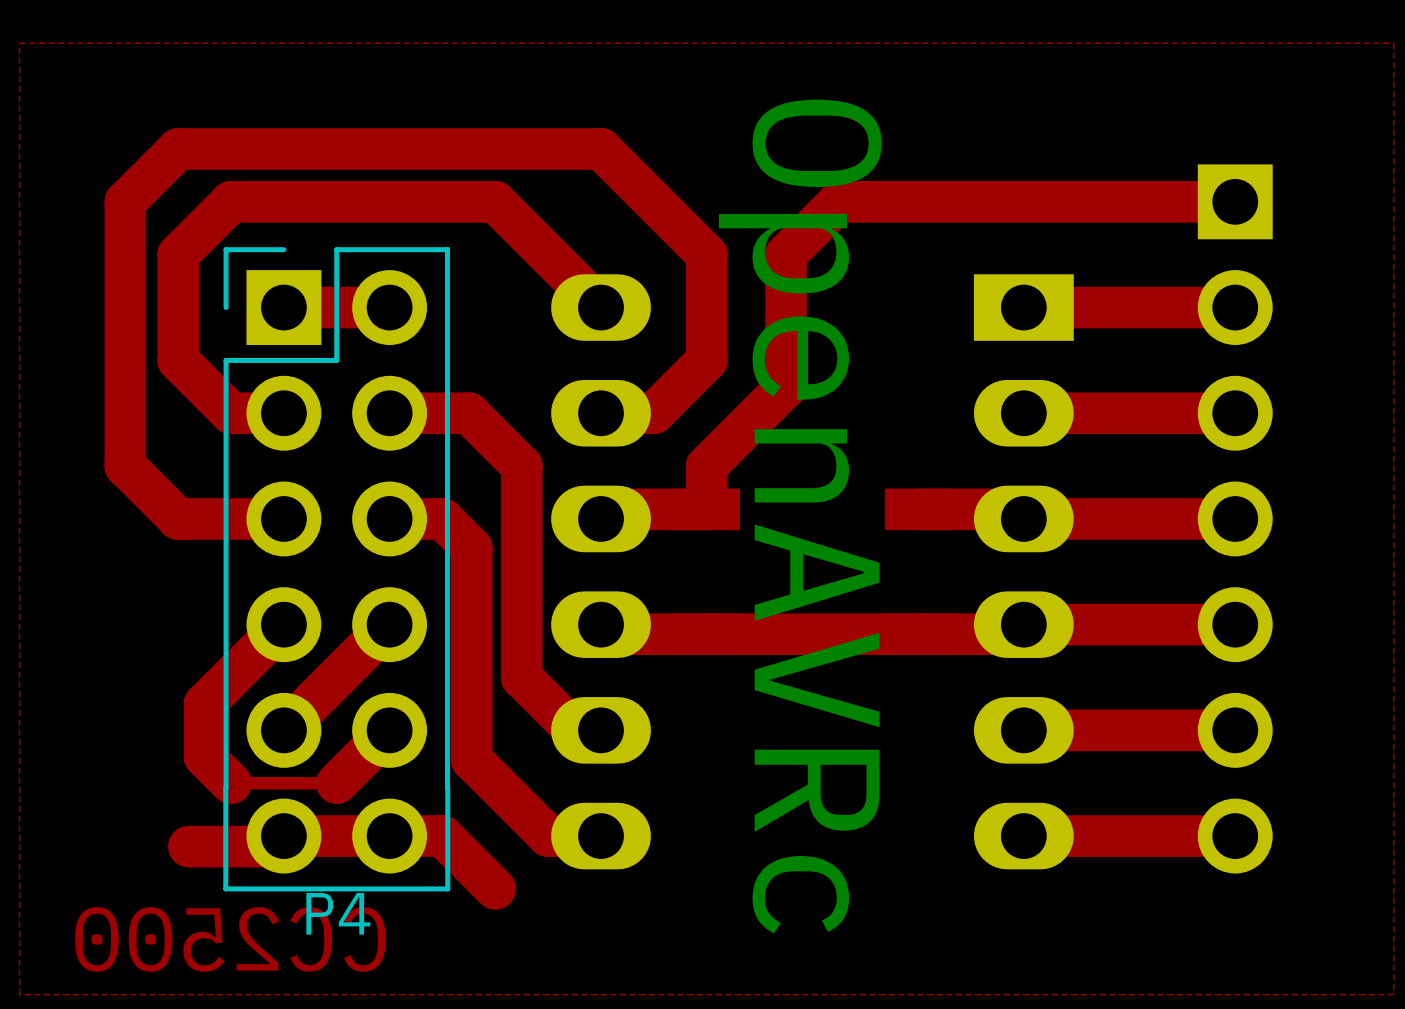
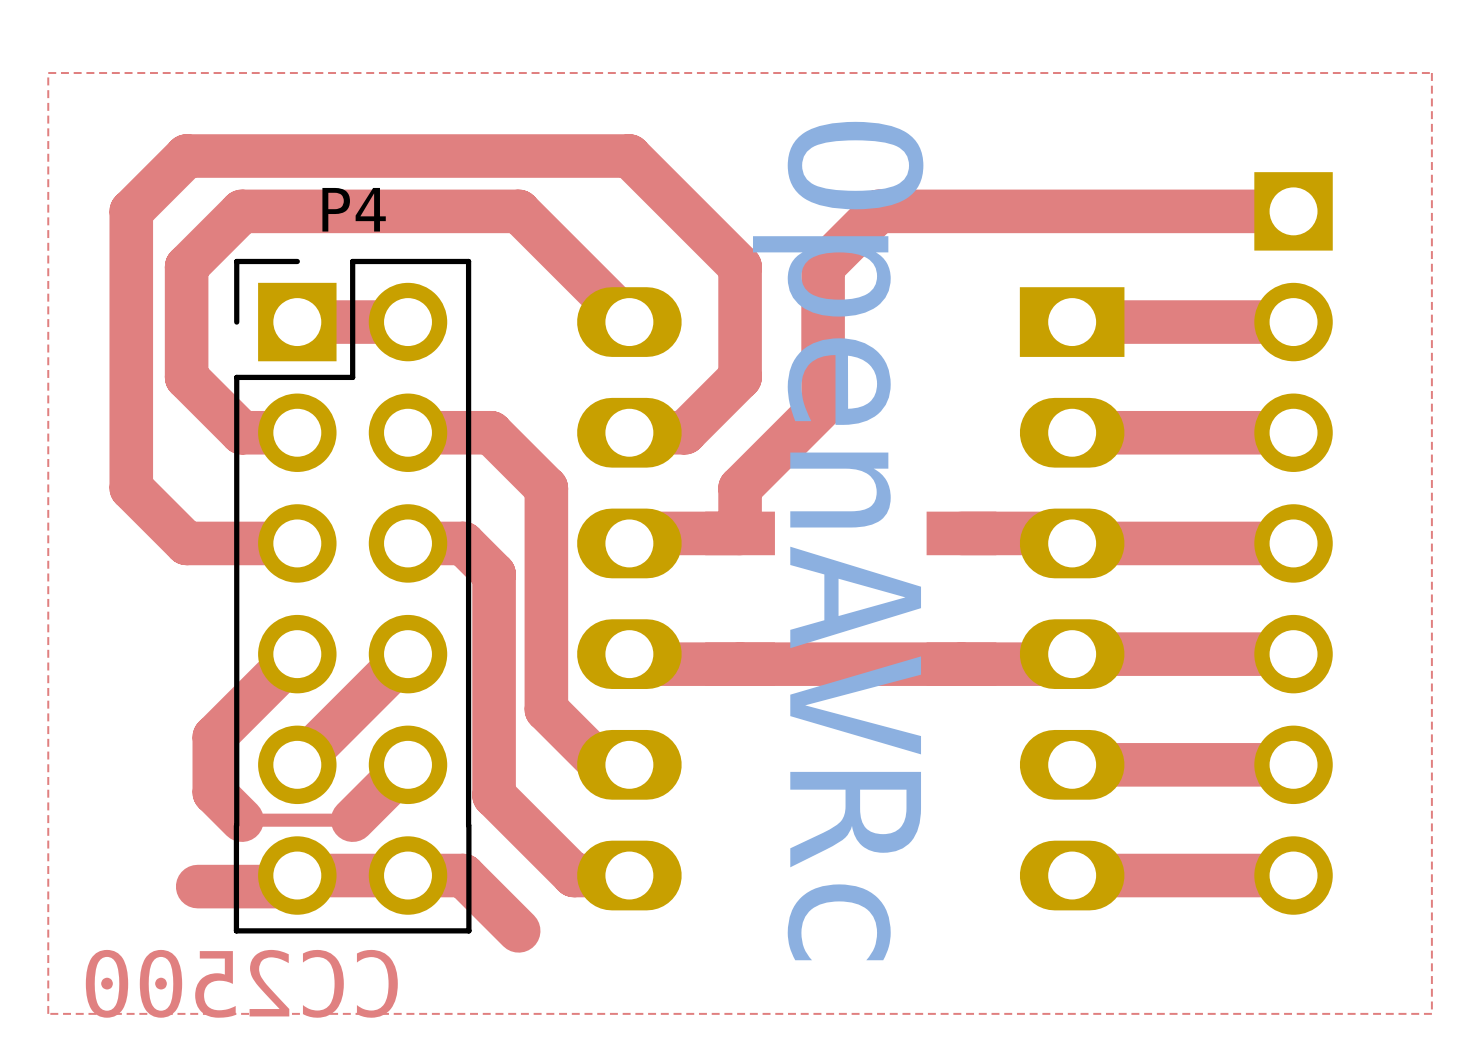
top zone outline: (1393, 43) (19, 43) (19, 994) (1393, 994) (1393, 43) -> (1431, 73) (1431, 1013) (48, 1013) (48, 73) (1431, 73)
P4 name position: P4 (338, 913) -> P4 (354, 209)

